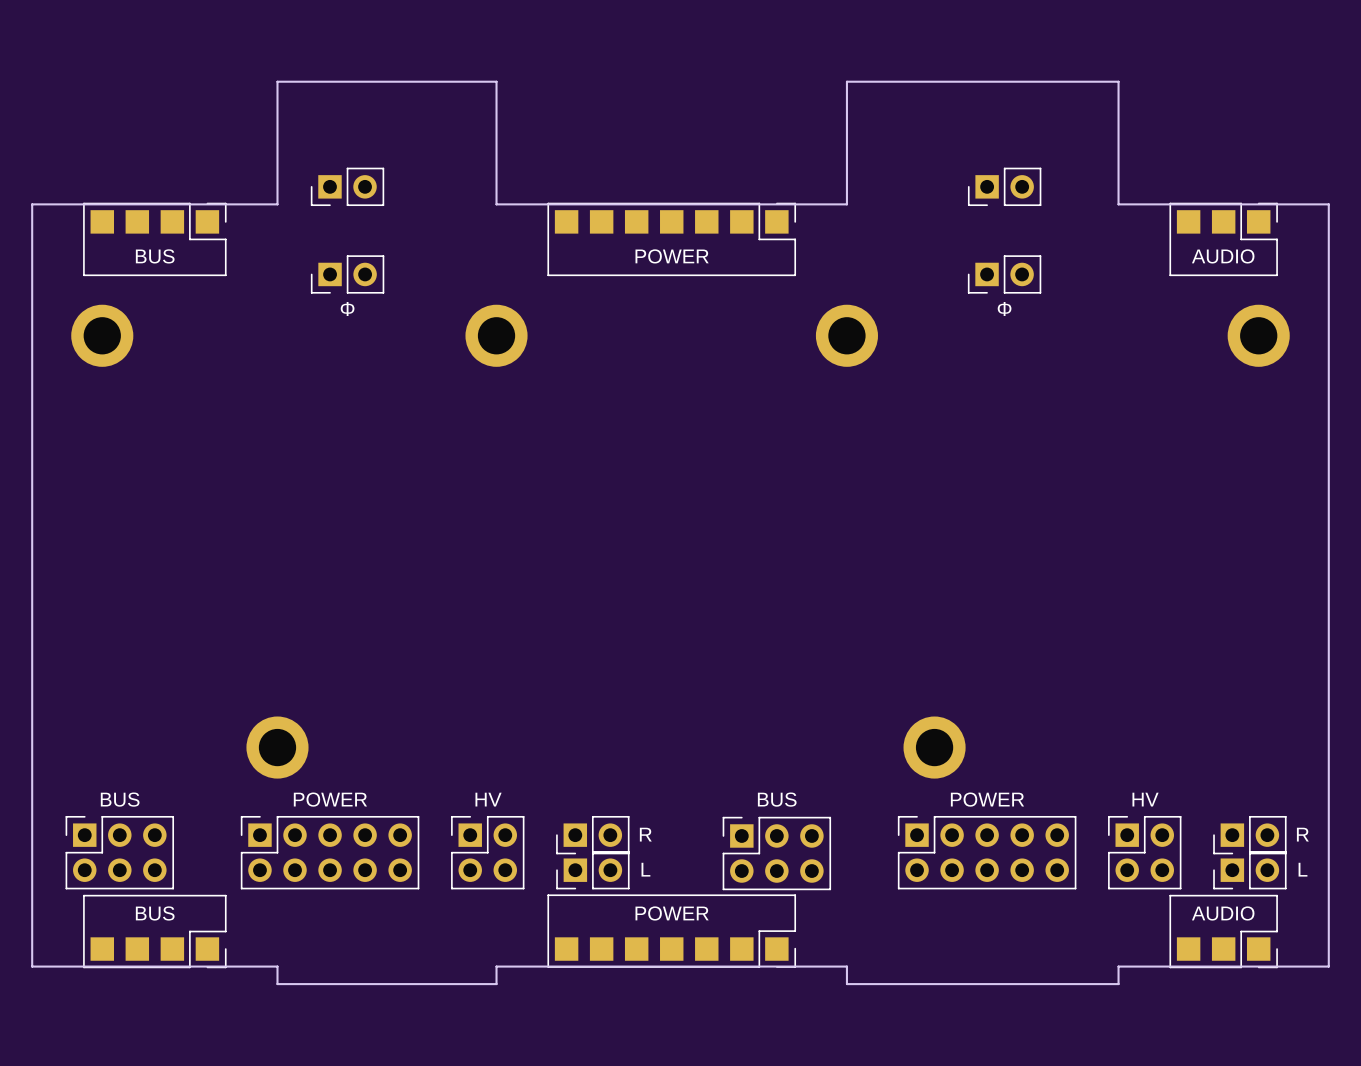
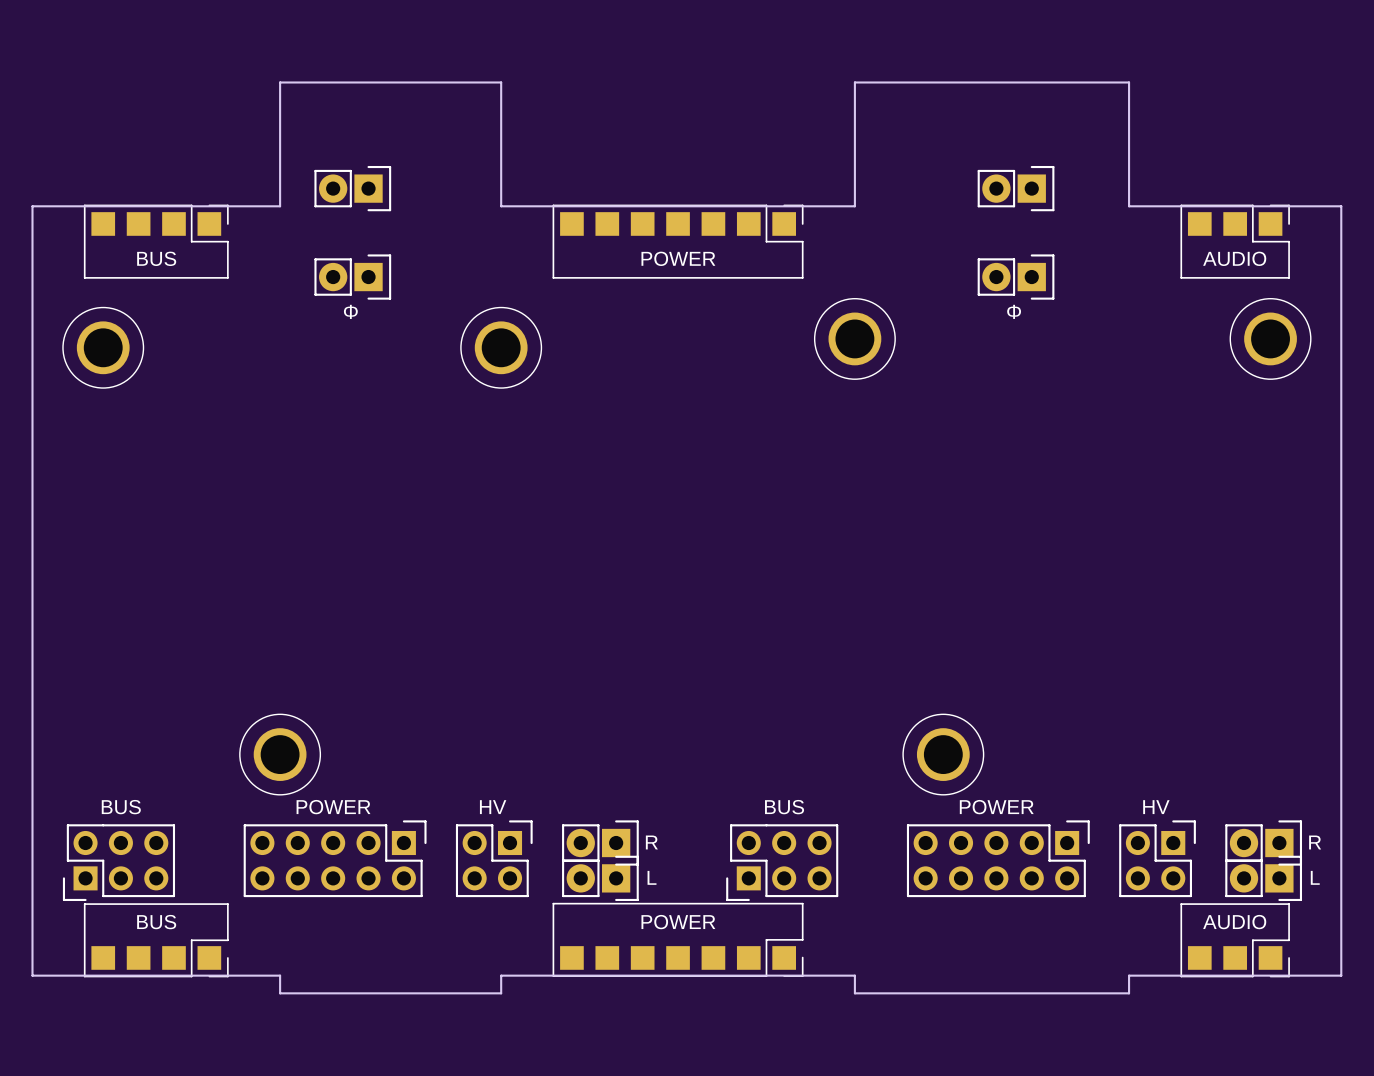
part footprint: [310, 167, 385, 207] -> [314, 165, 392, 212]
part footprint: [967, 167, 1042, 207] -> [977, 165, 1055, 212]
part footprint: [310, 255, 385, 294] -> [314, 254, 392, 300]
part footprint: [967, 255, 1042, 294] -> [977, 254, 1055, 300]
part footprint: [71, 304, 134, 367] -> [62, 306, 145, 389]
part footprint: [465, 304, 528, 367] -> [460, 306, 543, 389]
part footprint: [815, 304, 878, 367] -> [813, 298, 896, 380]
part footprint: [1227, 304, 1290, 367] -> [1229, 298, 1312, 380]
part footprint: [246, 716, 309, 779] -> [239, 713, 322, 796]
part footprint: [903, 716, 966, 779] -> [902, 713, 985, 796]
part footprint: [65, 815, 175, 890] -> [62, 824, 176, 902]
part footprint: [240, 815, 420, 890] -> [243, 820, 427, 898]
part footprint: [451, 815, 525, 890] -> [455, 820, 533, 898]
part footprint: [556, 815, 630, 855] -> [562, 820, 639, 866]
part footprint: [897, 815, 1077, 890] -> [906, 820, 1090, 898]
part footprint: [1108, 815, 1182, 890] -> [1119, 820, 1196, 898]
part footprint: [1213, 815, 1287, 855] -> [1225, 820, 1303, 866]
part footprint: [722, 816, 832, 891] -> [726, 824, 839, 902]
part footprint: [556, 851, 630, 890] -> [562, 855, 639, 902]
part footprint: [1213, 851, 1287, 890] -> [1225, 855, 1303, 902]

